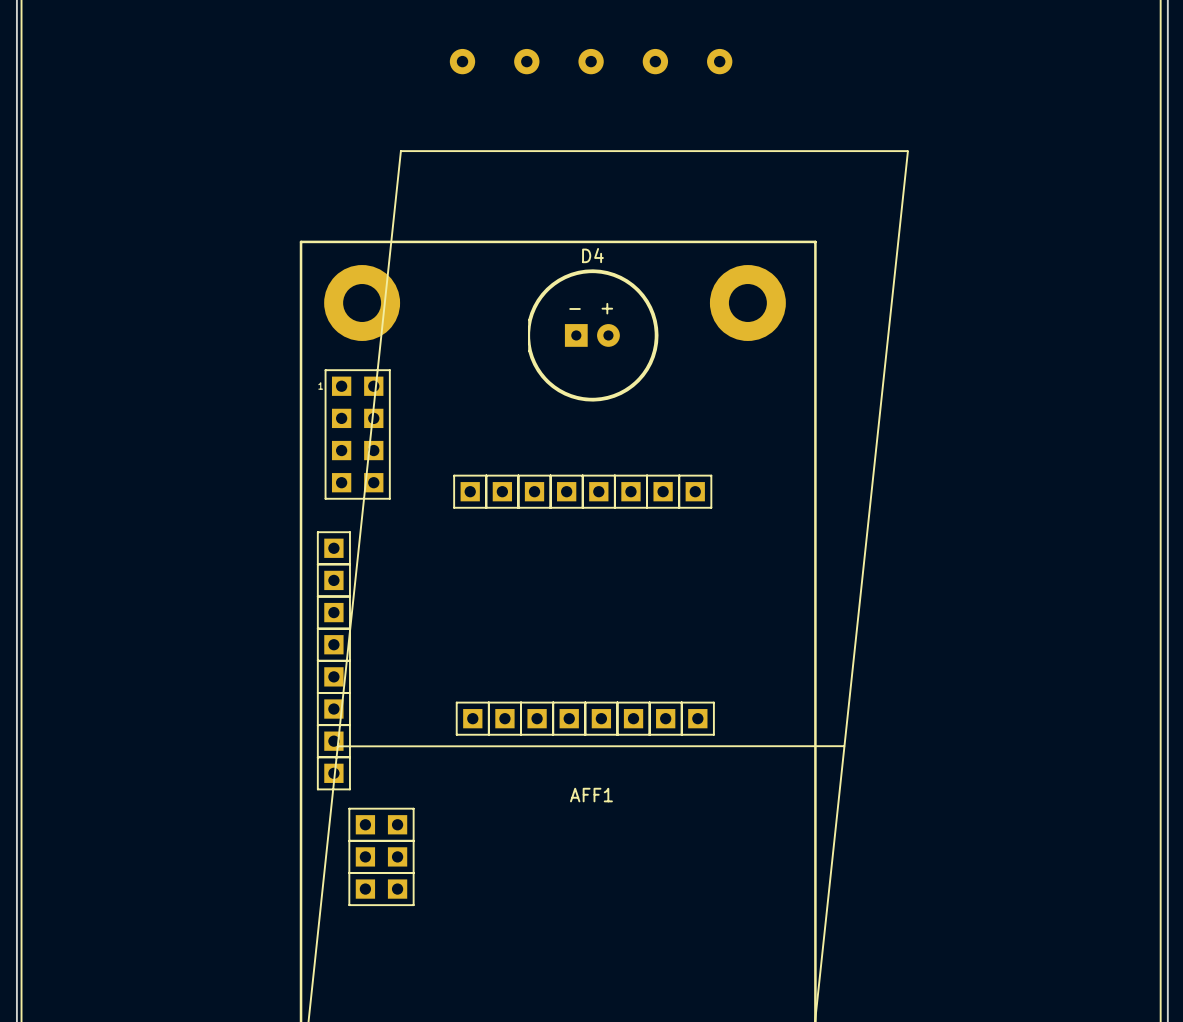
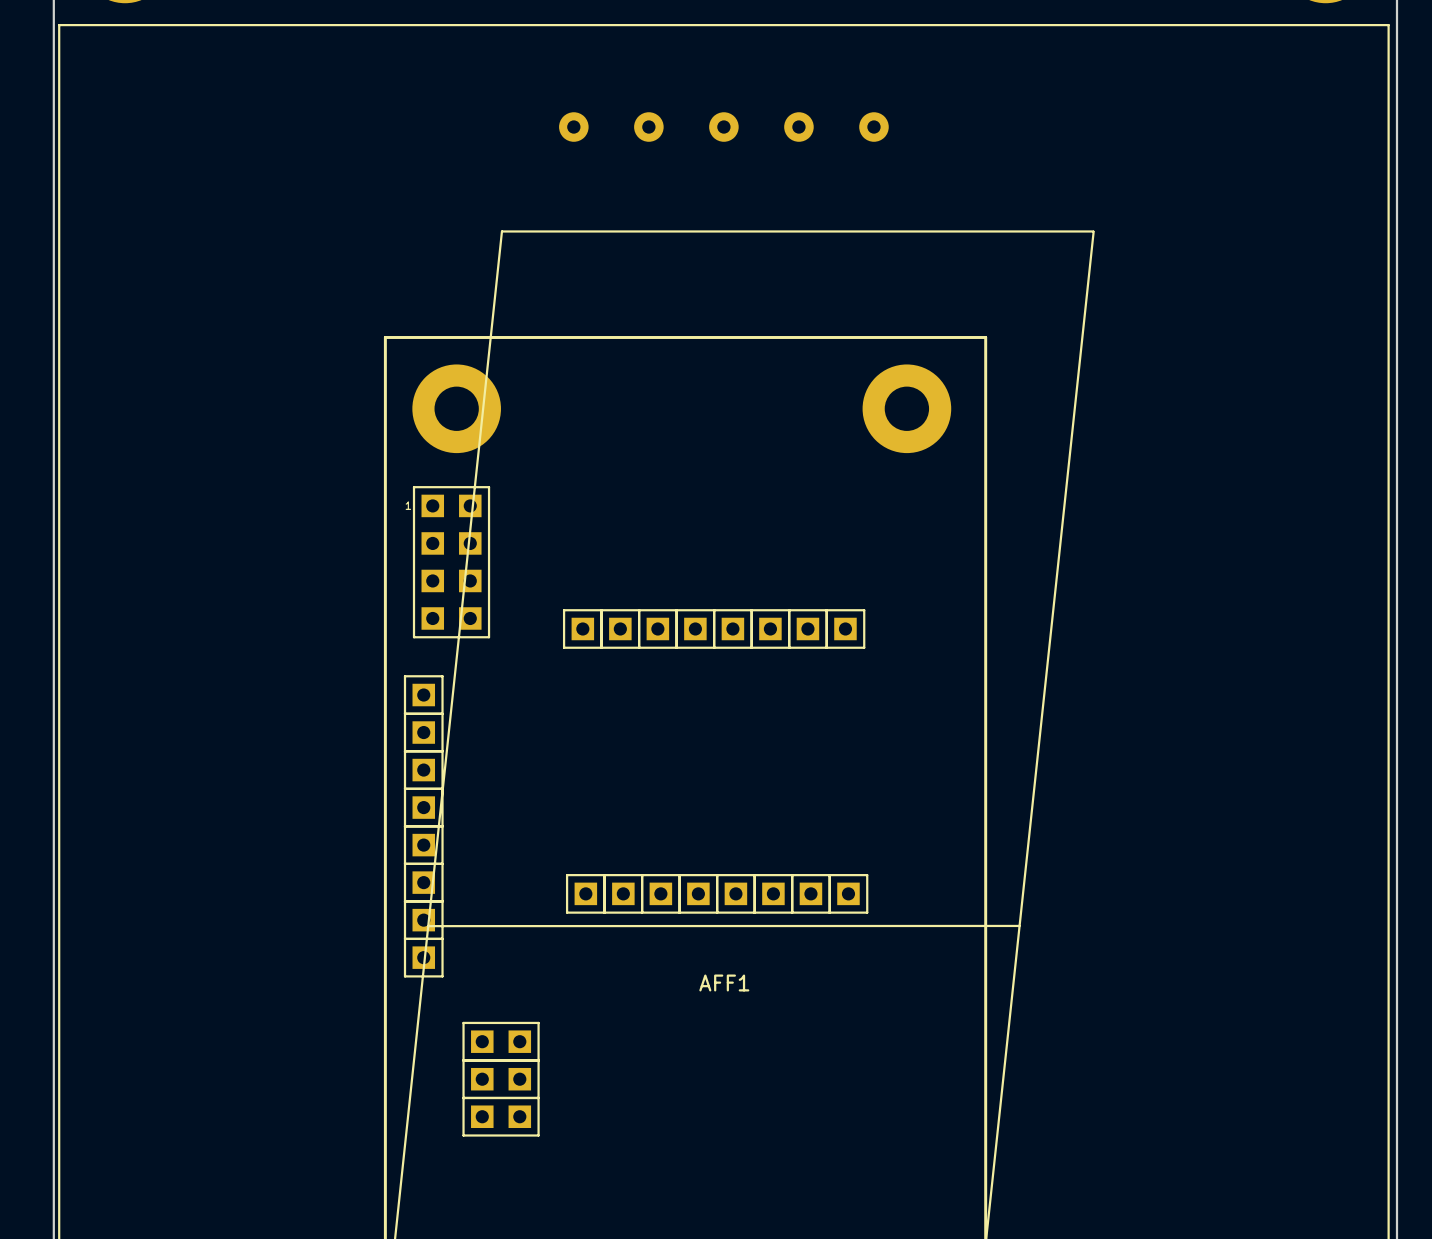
D4: (593, 335) -> none
part: (381, 824) -> none
part: none -> (501, 1041)
part: (381, 856) -> none
part: none -> (501, 1079)
part: (381, 889) -> none
part: none -> (501, 1116)

